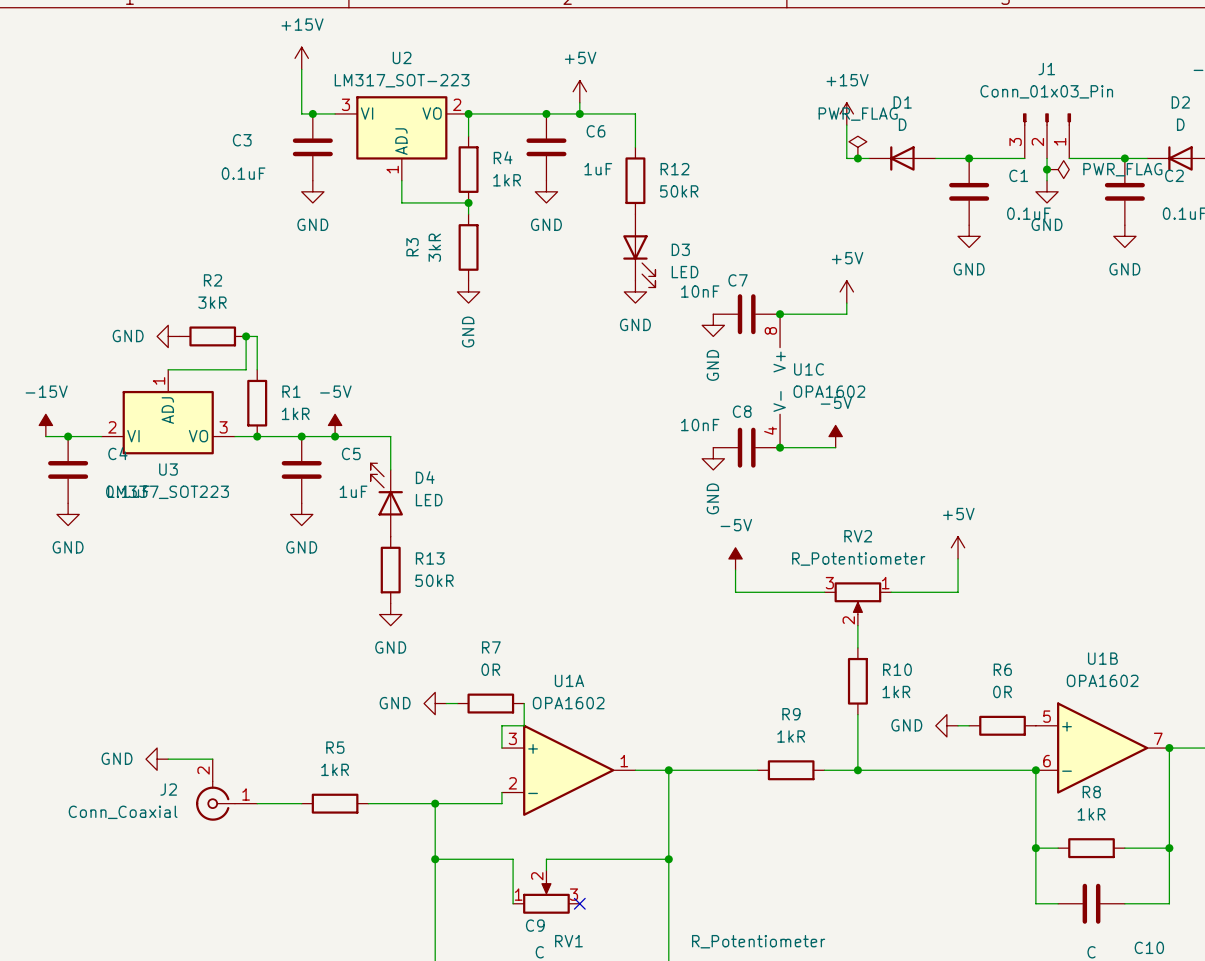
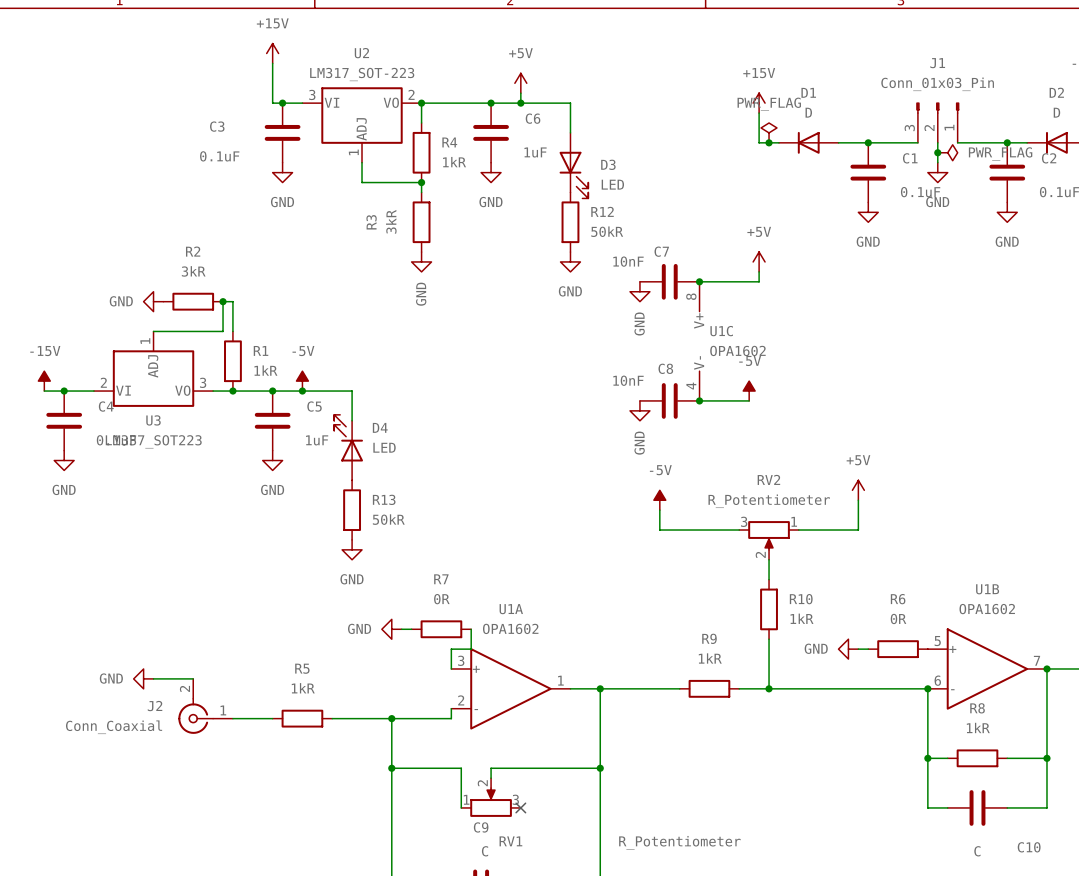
R12 position: (635, 180) -> (570, 222)
D3 position: (639, 250) -> (573, 165)

